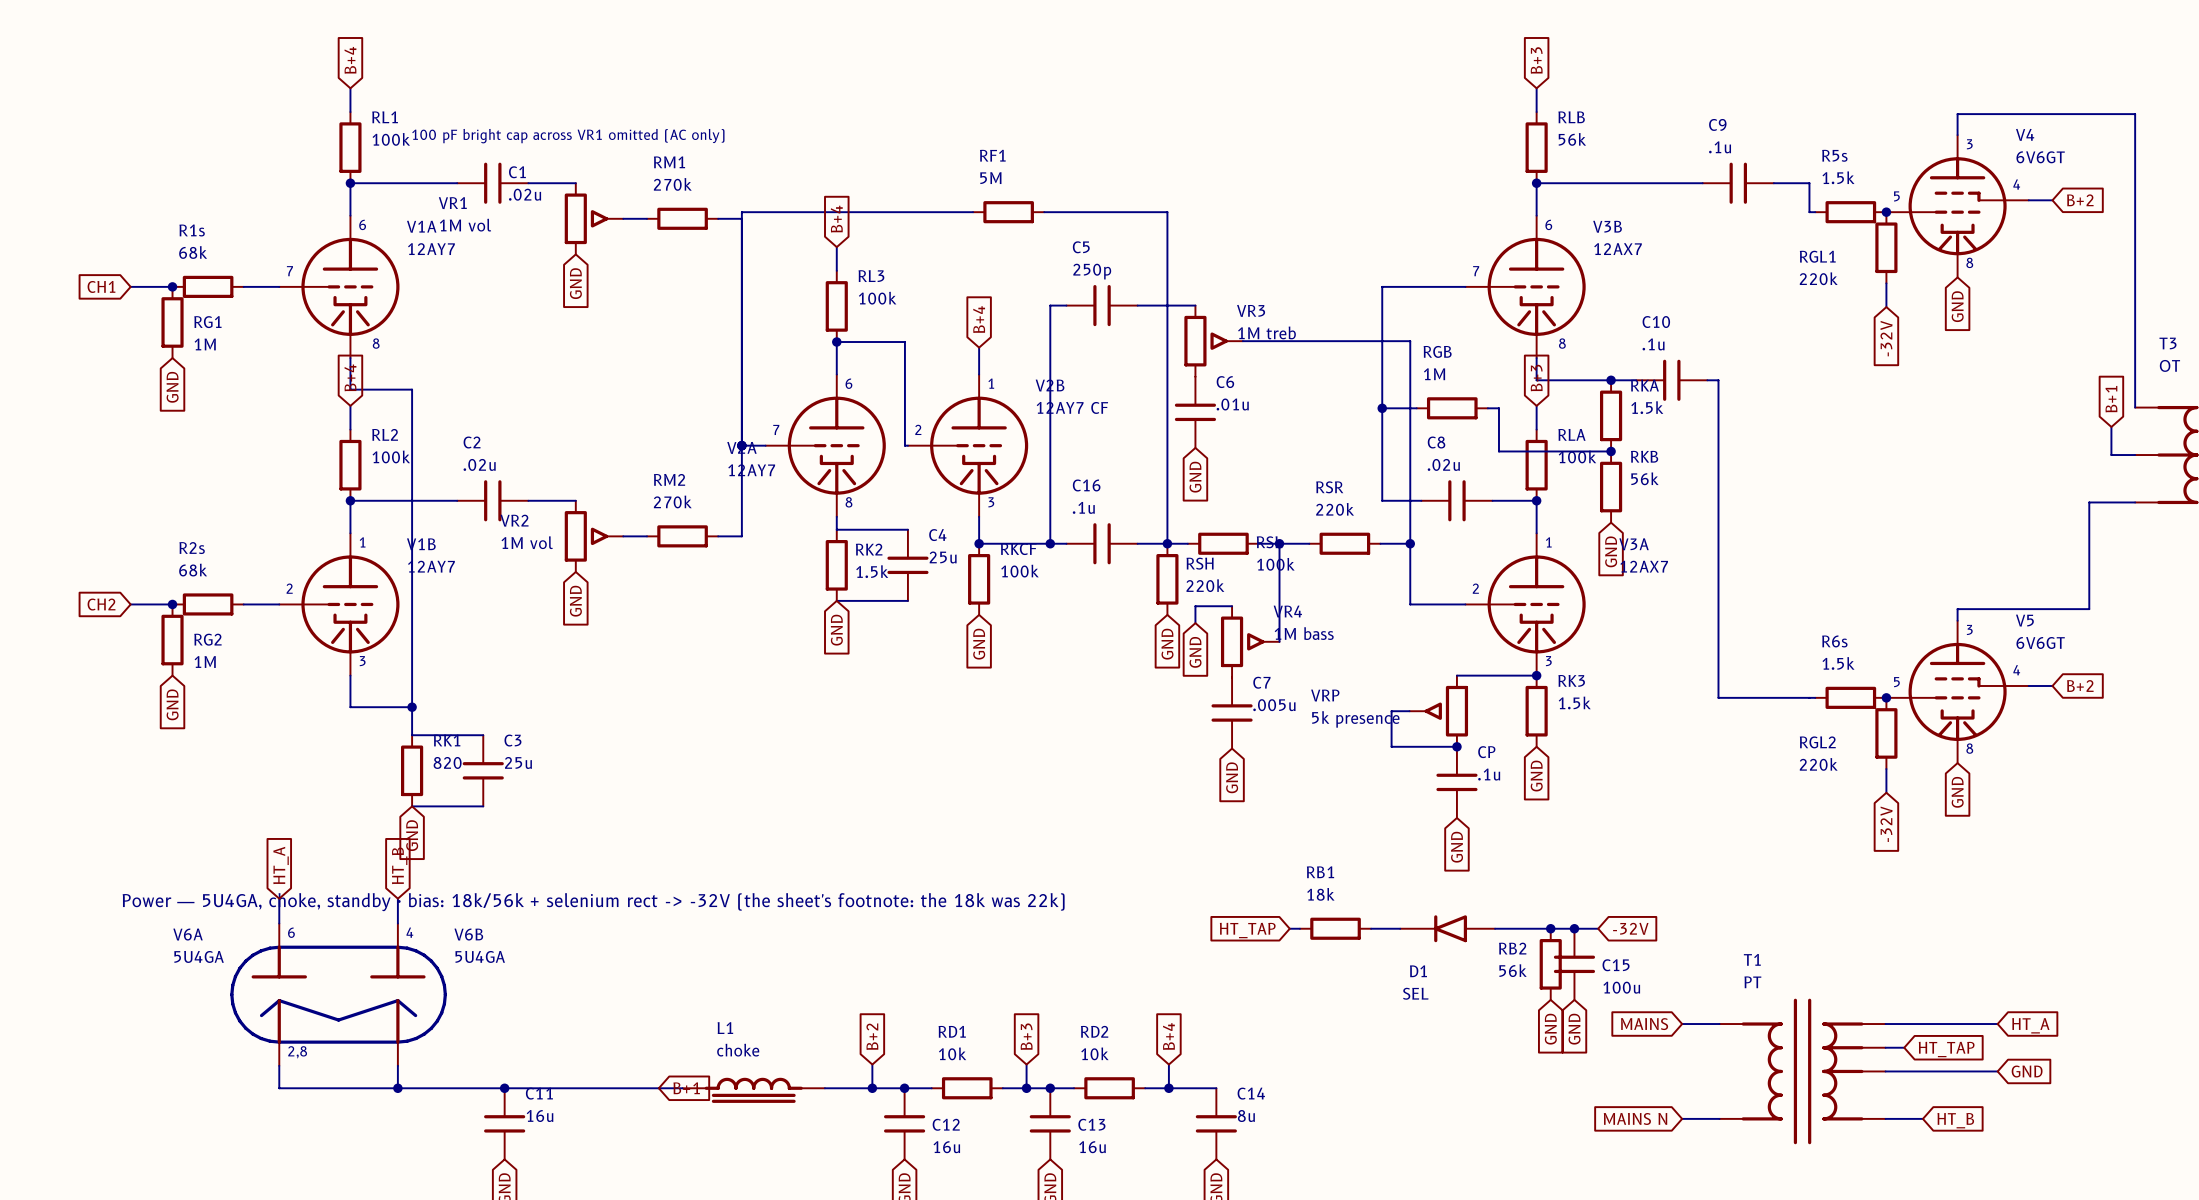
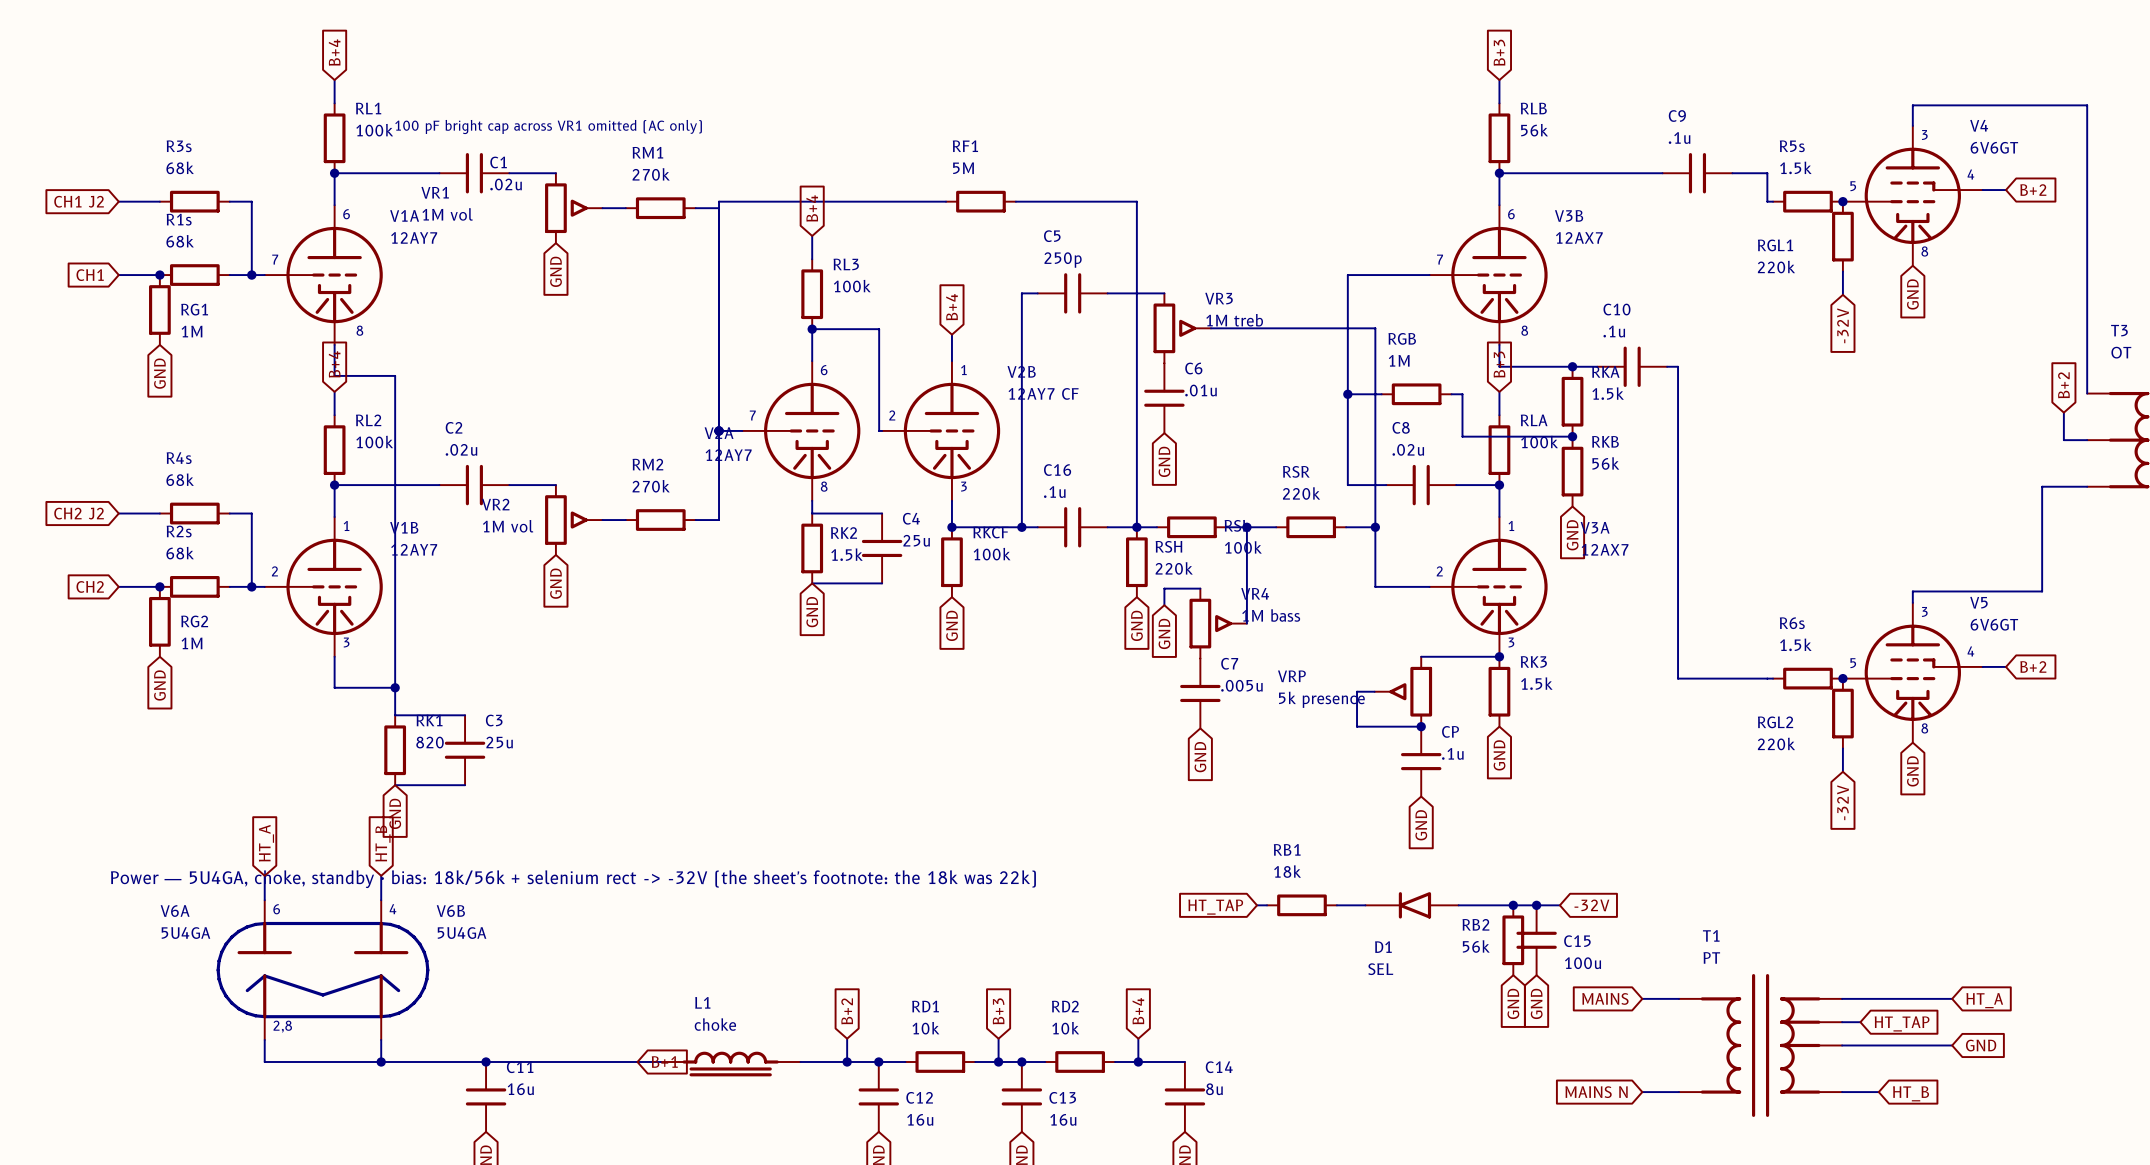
global label: none -> CH1 J2 (79, 201)
wire: none -> (118, 201) (159, 201)
R3s: none -> 68k (194, 201)
wire: none -> (229, 201) (251, 201) (251, 275)
junction: none -> (251, 275)
global label: B+1 (2111, 399) -> B+2 (2063, 385)
global label: none -> CH2 J2 (79, 513)
wire: none -> (118, 513) (159, 513)
R4s: none -> 68k (194, 513)
wire: none -> (229, 513) (251, 513) (251, 586)
junction: none -> (251, 586)

